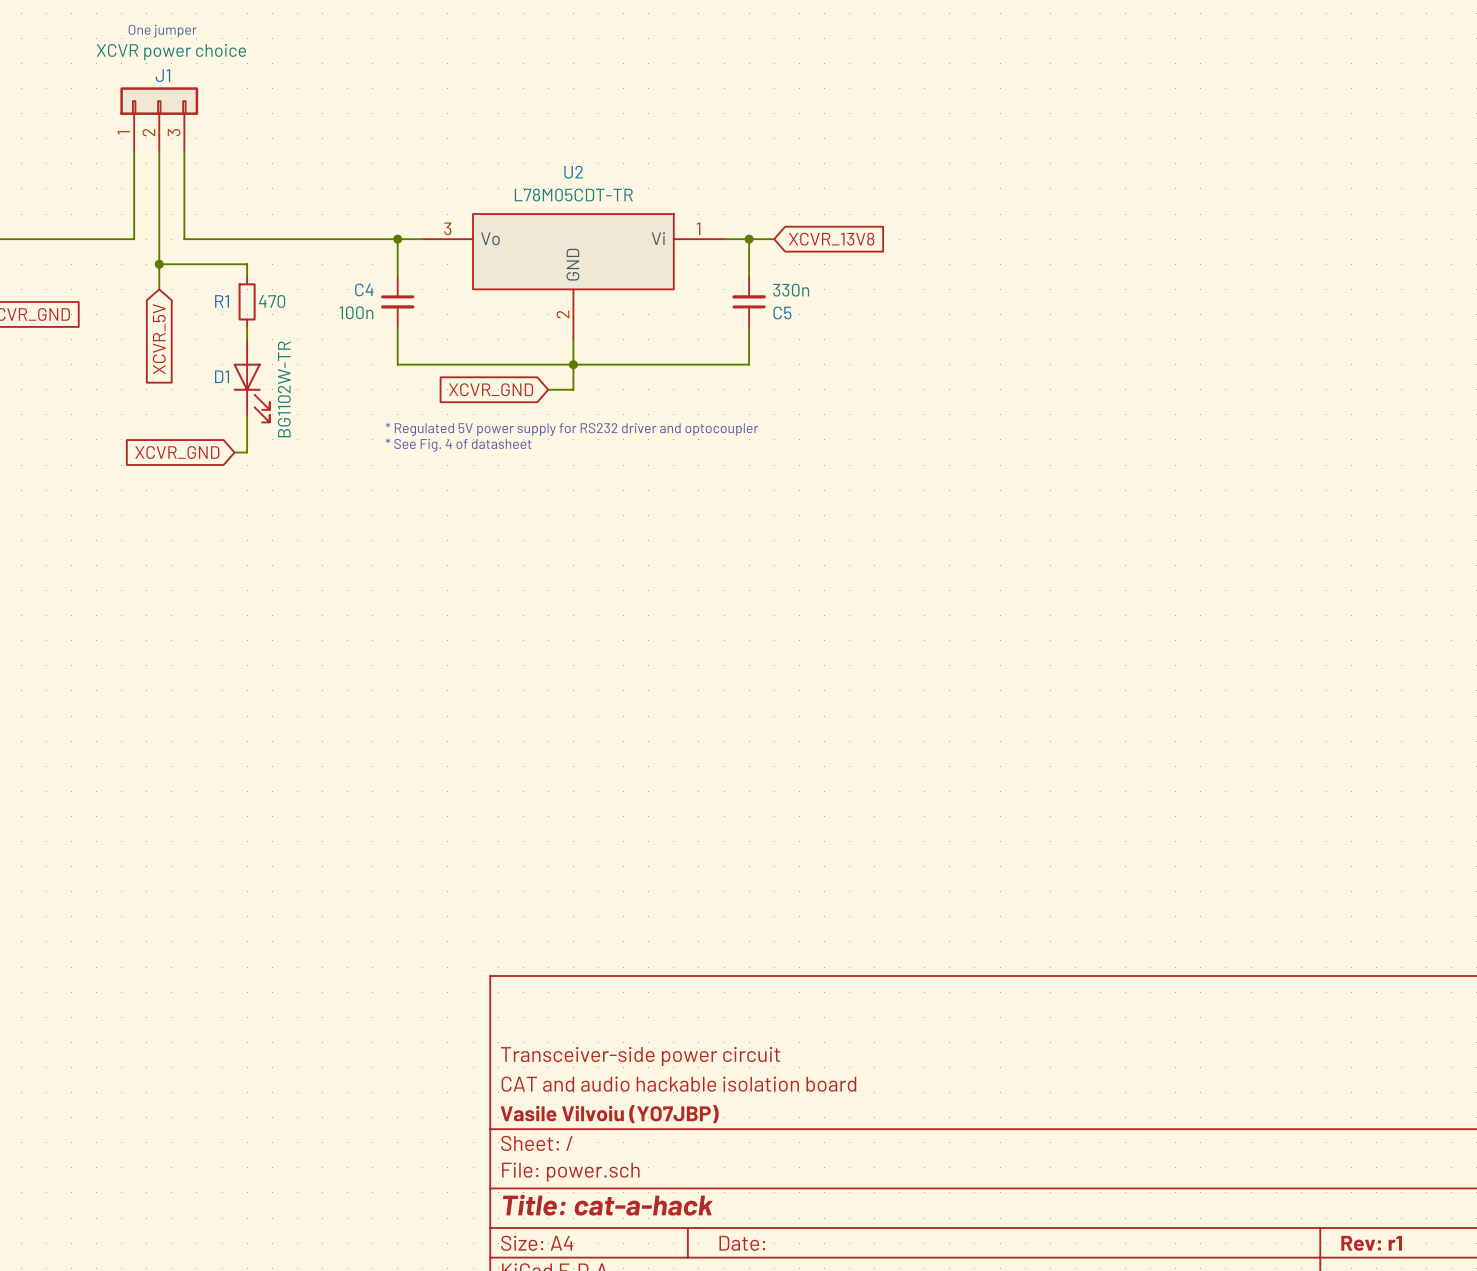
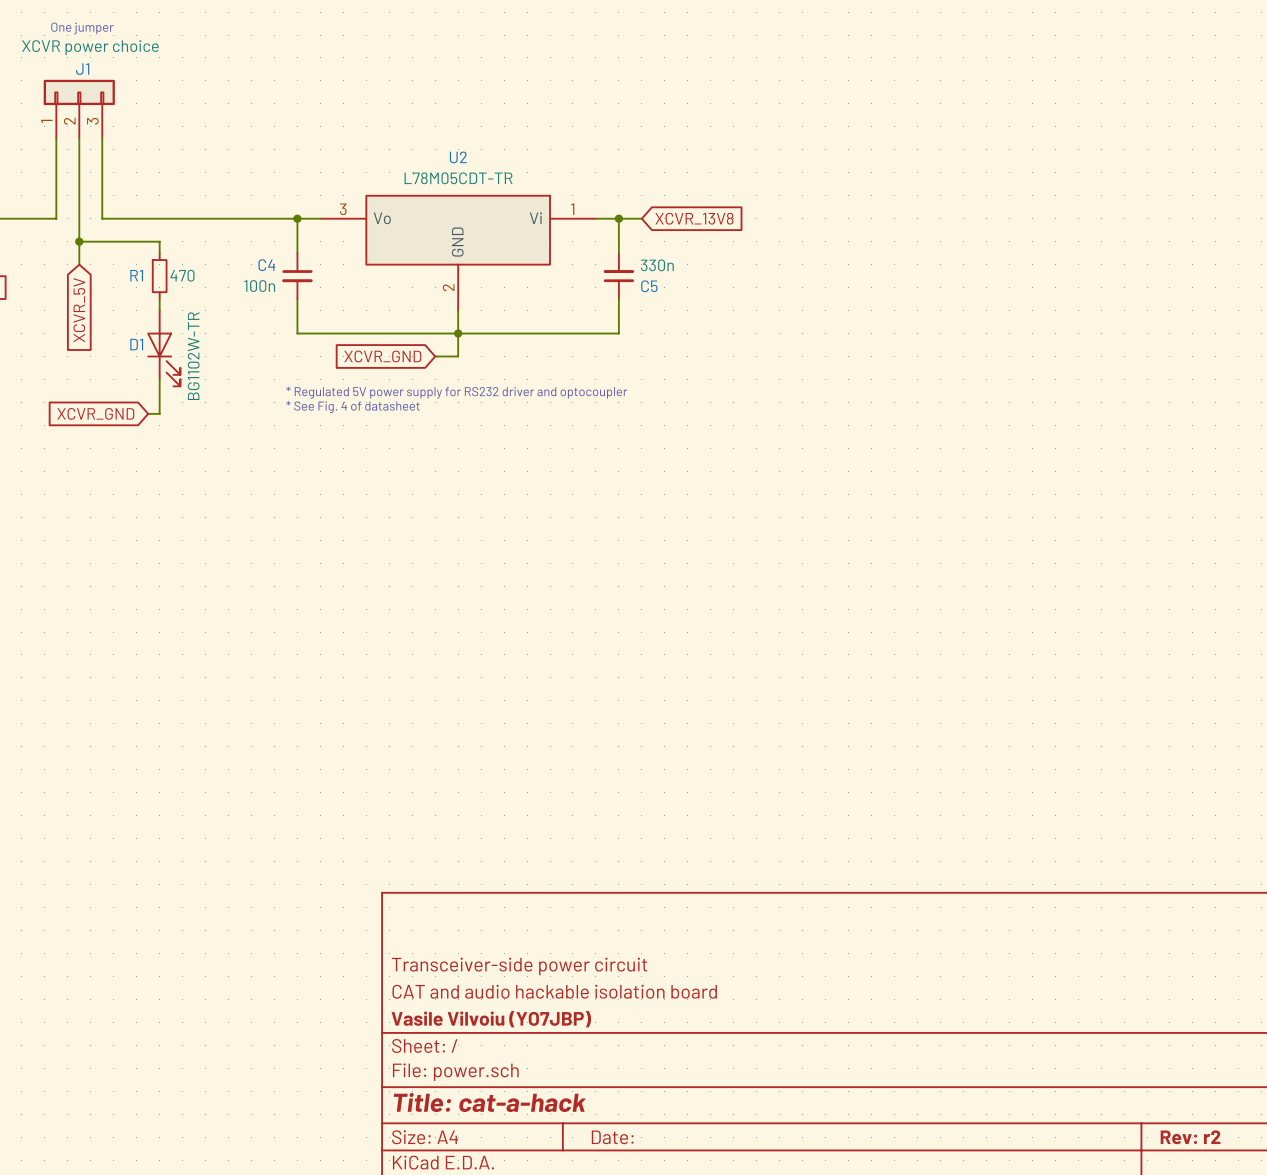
title block: Rev: r1 (1371, 1243) -> Rev: r2 (1190, 1137)

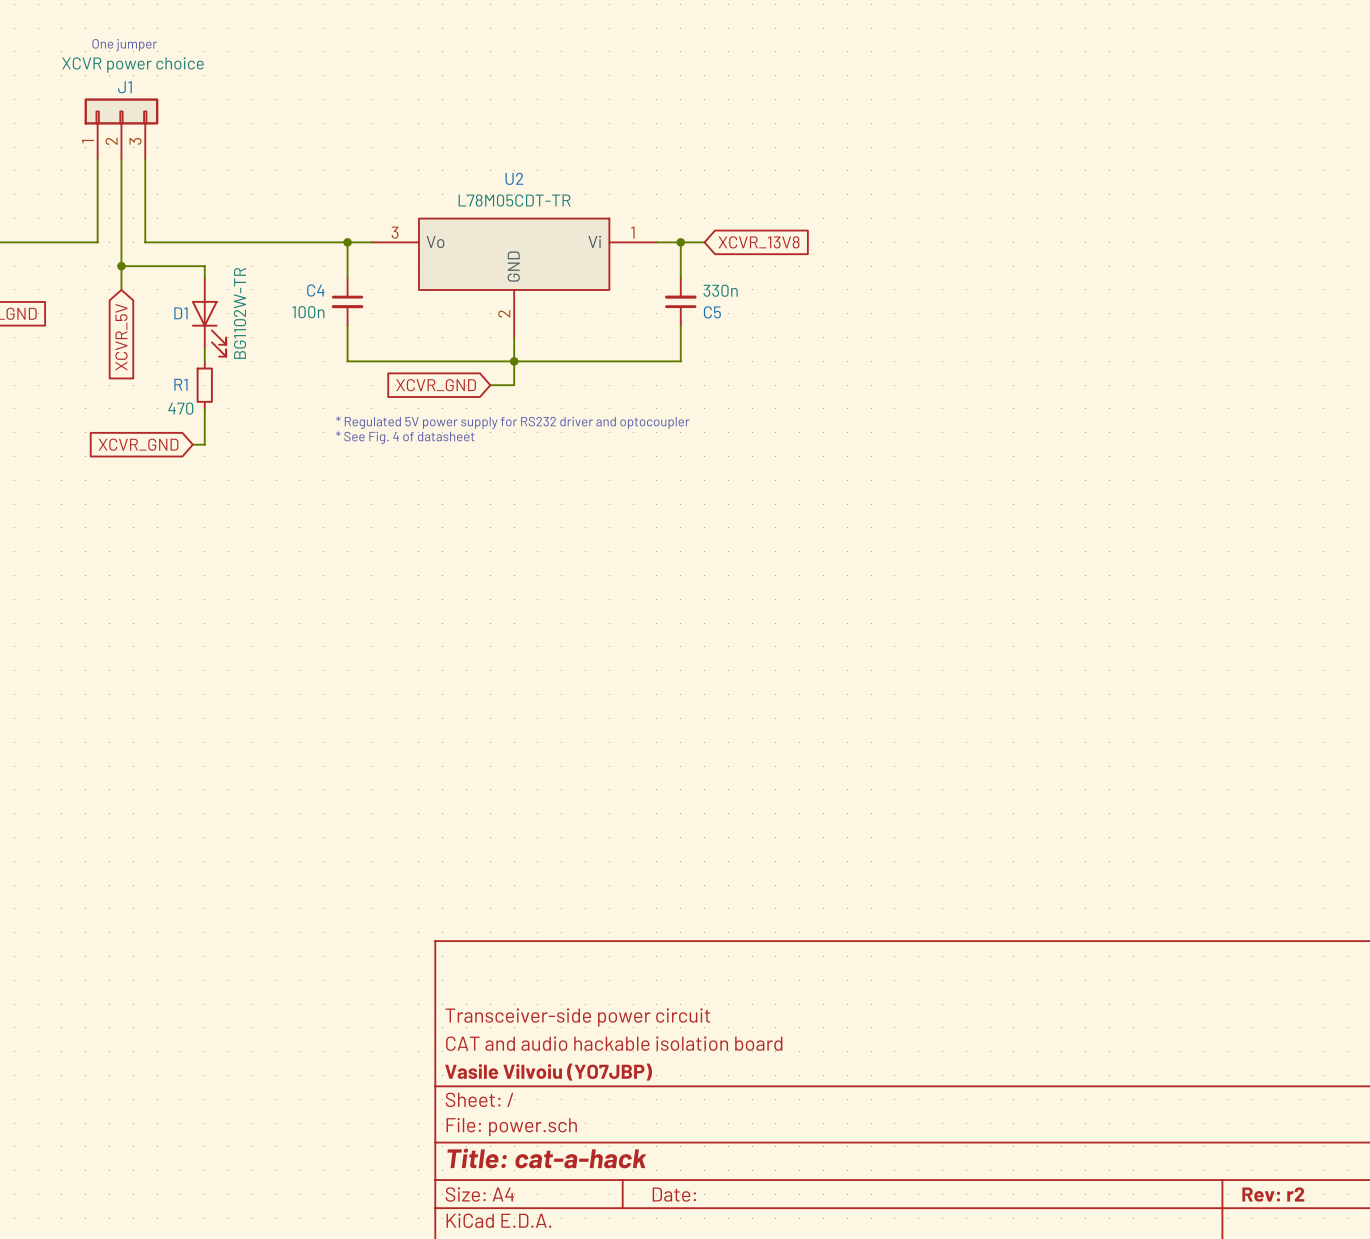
R1 value position: 470 (182, 275) -> 470 (180, 408)
R1 position: (159, 276) -> (204, 385)
D1 position: (163, 348) -> (209, 317)
D1 value position: BG1102W-TR (193, 356) -> BG1102W-TR (240, 313)

